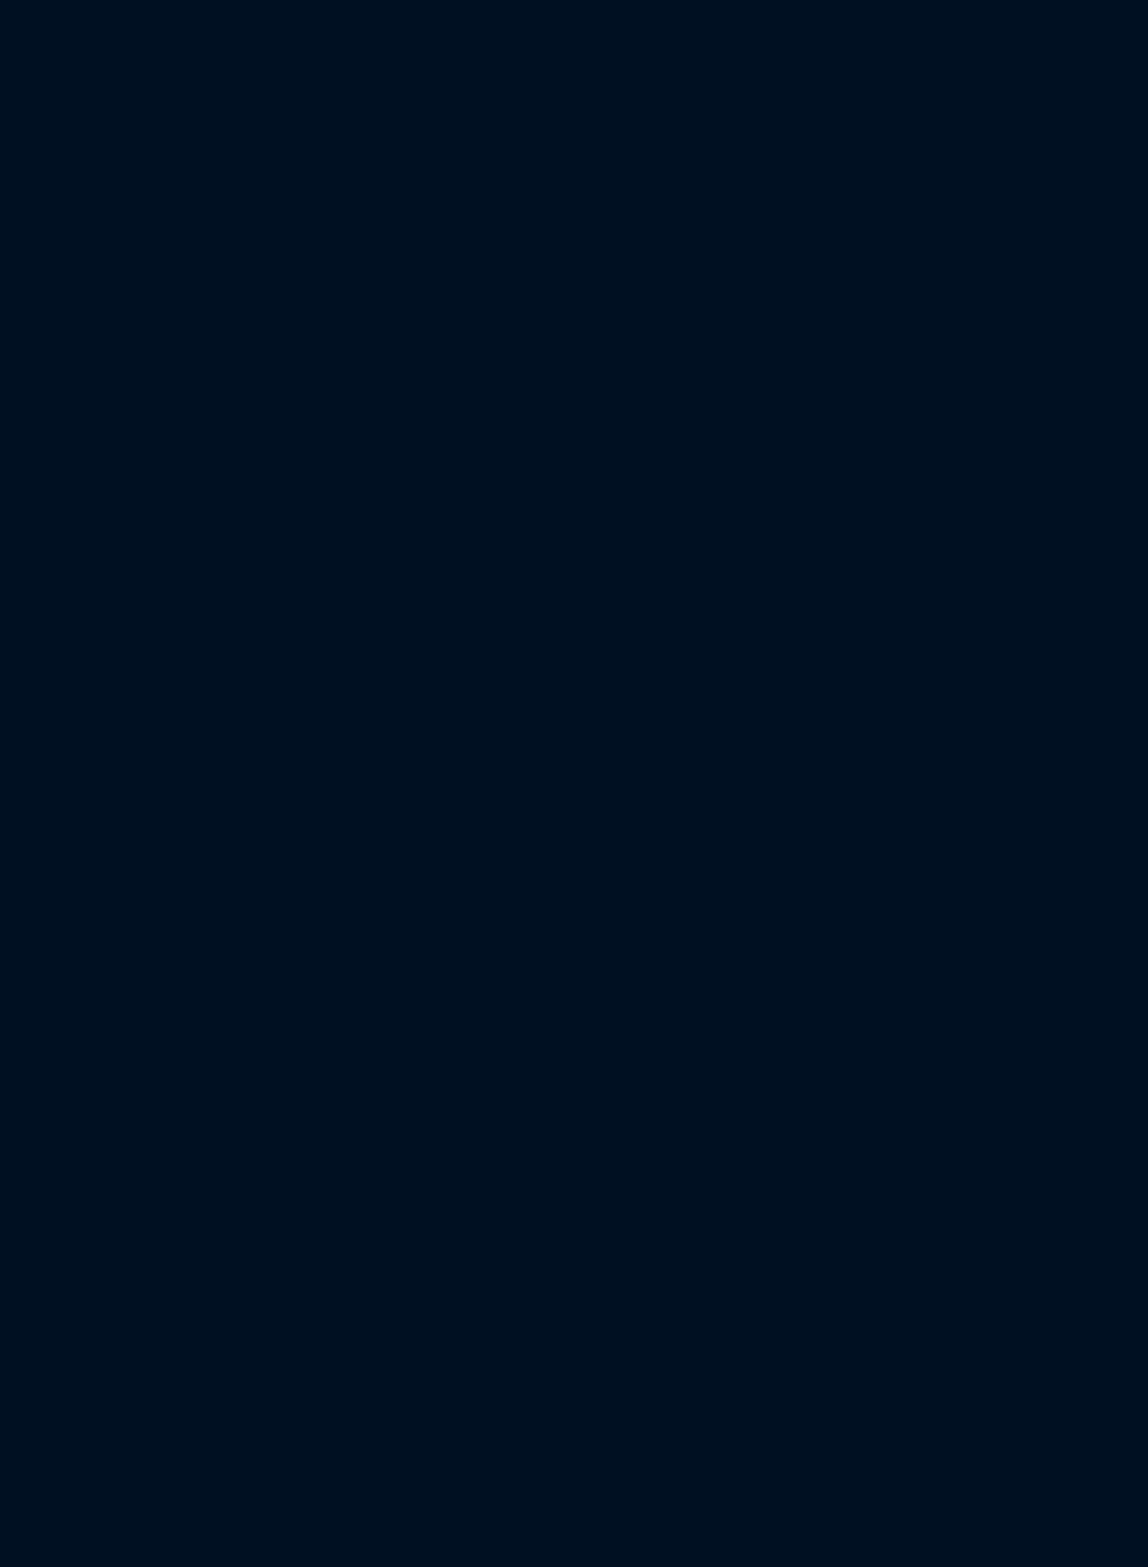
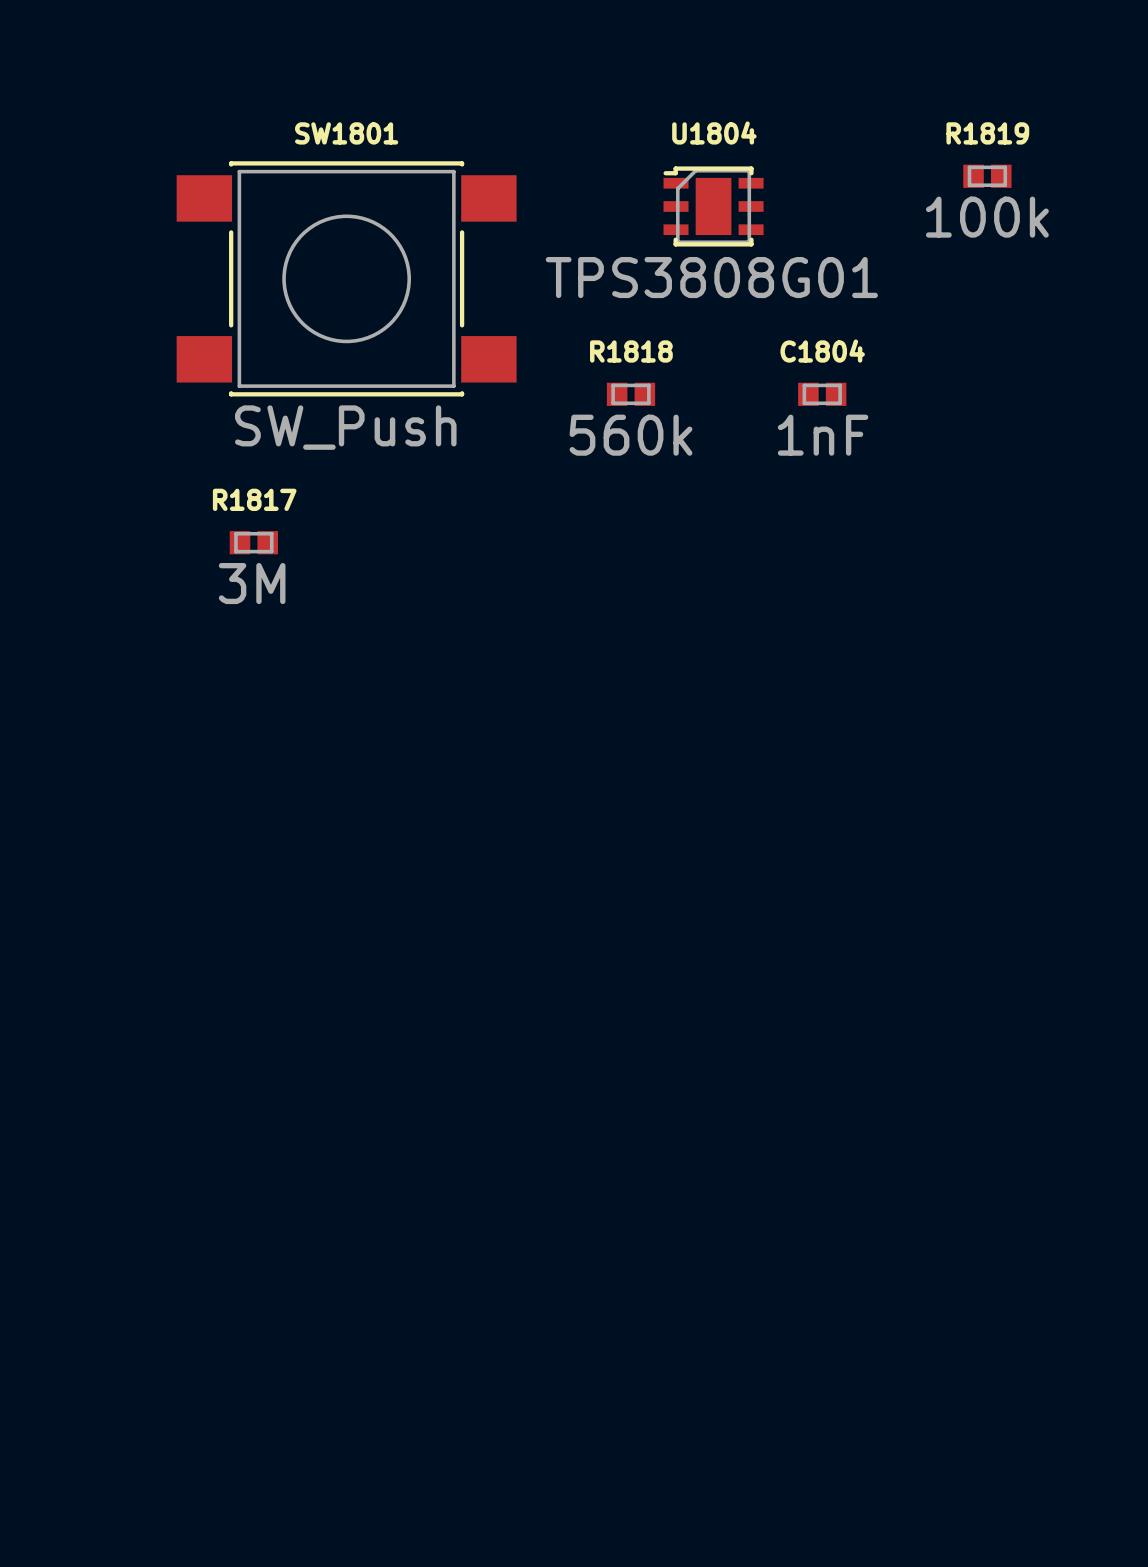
R1819: none -> 100k (987, 176)
U1804: none -> TPS3808G01 (713, 206)
SW1801: none -> SW_Push (346, 278)
R1818: none -> 560k (630, 394)
C1804: none -> 1nF (822, 394)
R1817: none -> 3M (253, 542)

